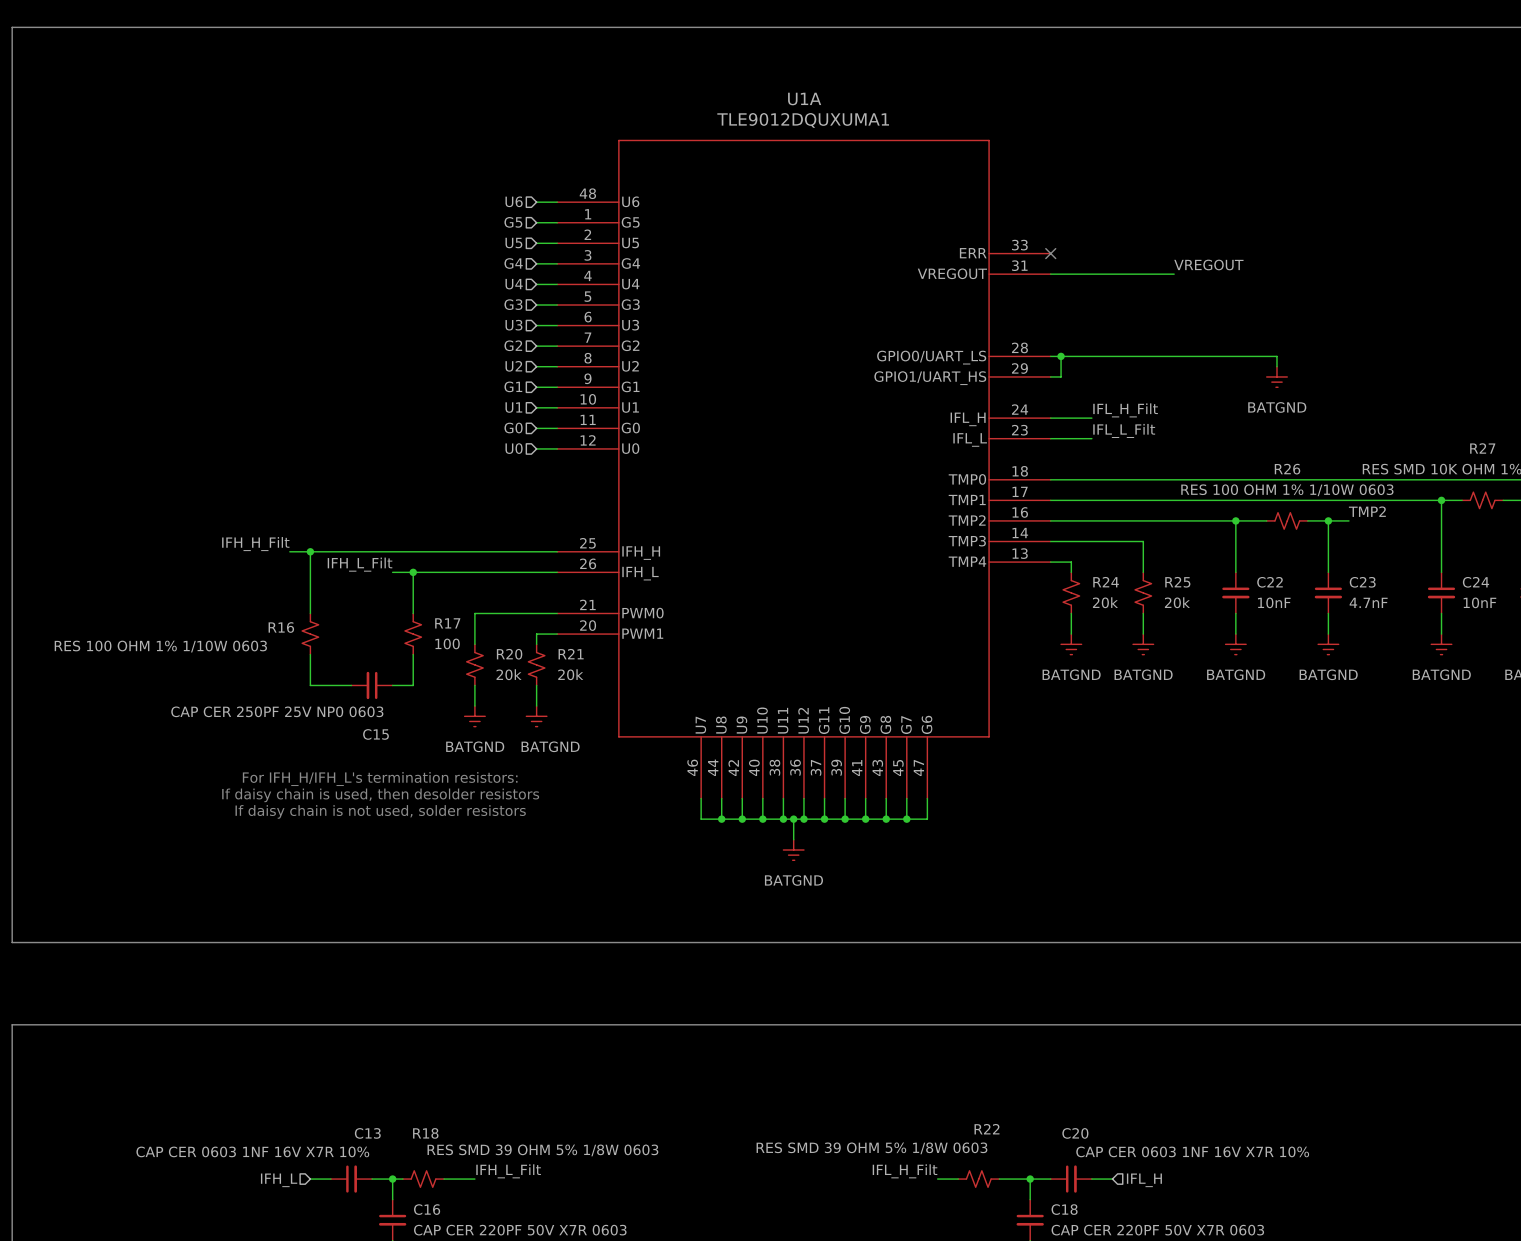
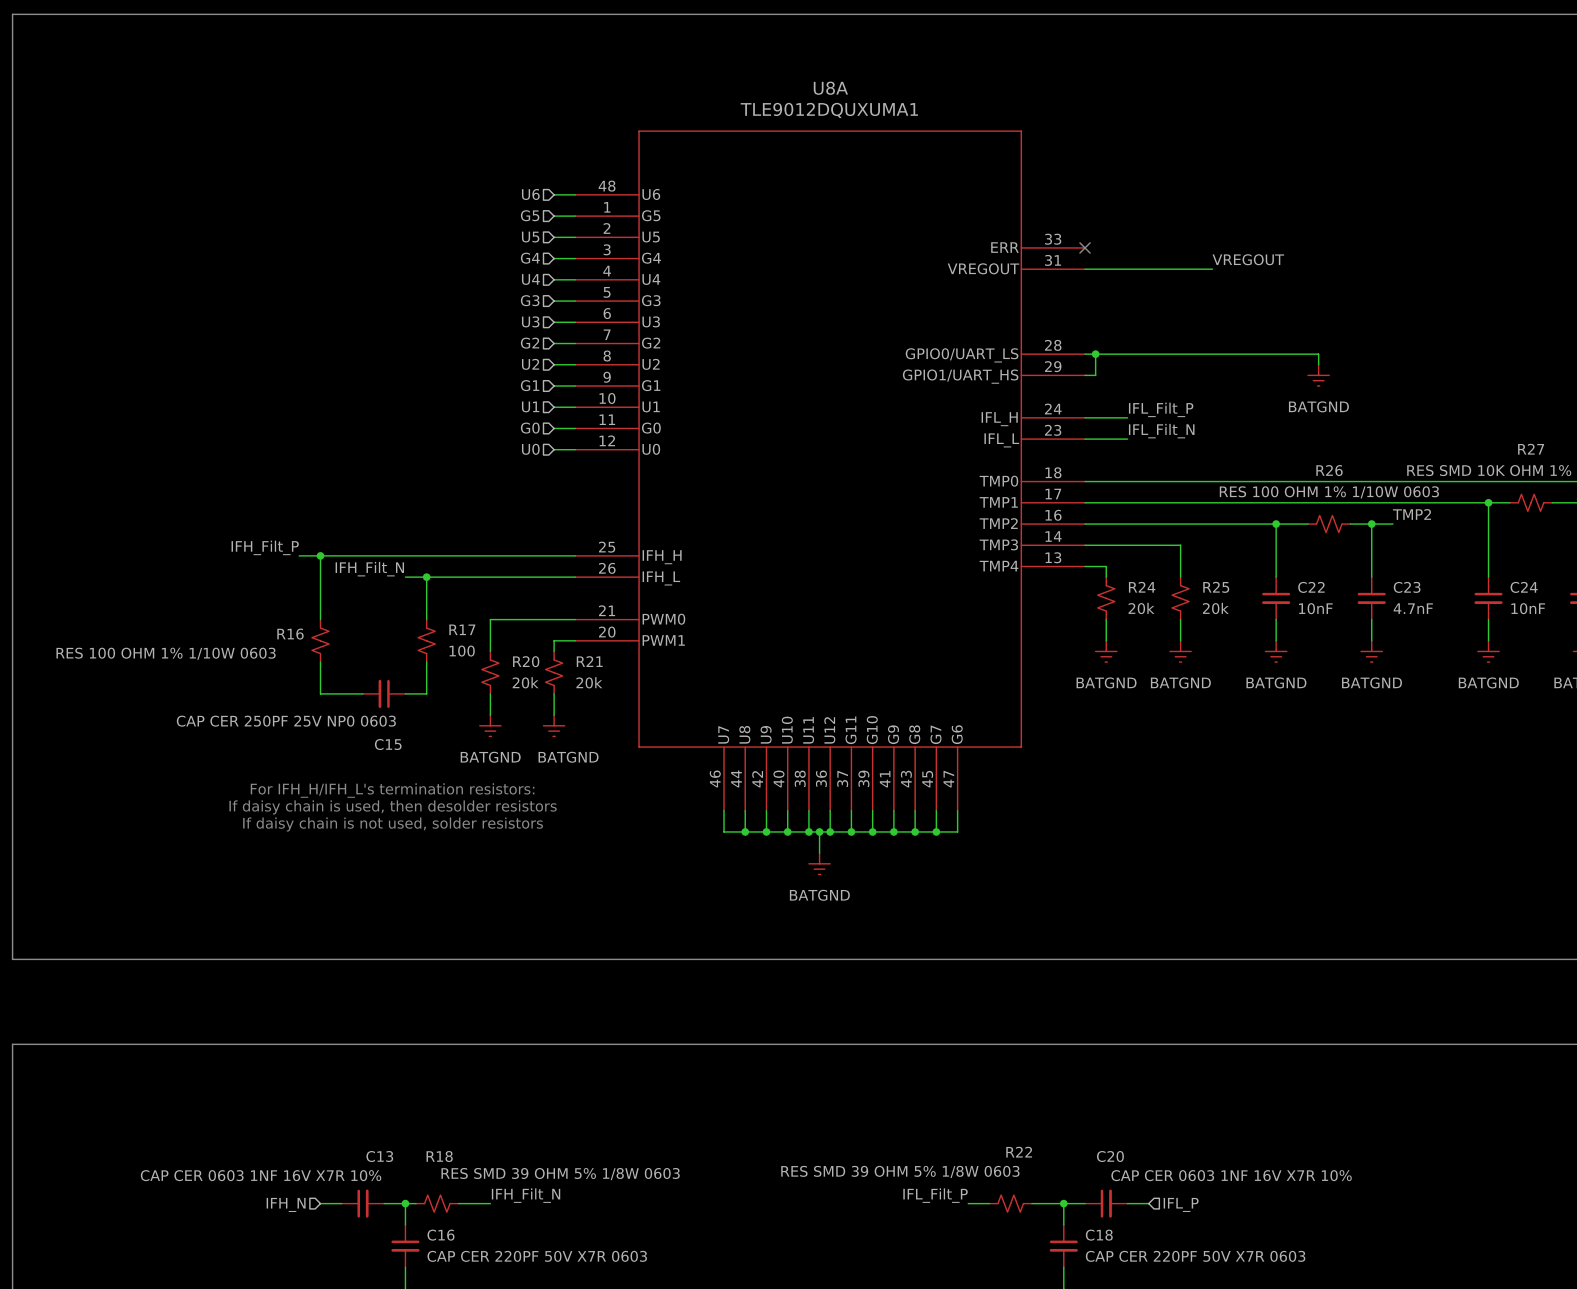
U1A name: U1A (804, 99) -> U8A (830, 88)
label: IFL_H_Filt (1125, 410) -> IFL_Filt_P (1161, 409)
label: IFL_L_Filt (1124, 430) -> IFL_Filt_N (1161, 431)
label: IFH_H_Filt (255, 544) -> IFH_Filt_P (265, 547)
label: IFH_L_Filt (360, 564) -> IFH_Filt_N (369, 569)
label: IFH_L_Filt (508, 1171) -> IFH_Filt_N (526, 1195)
label: IFL_H_Filt (905, 1171) -> IFL_Filt_P (935, 1195)
hierarchical label: IFH_L (279, 1180) -> IFH_N (286, 1204)
hierarchical label: IFL_H (1144, 1180) -> IFL_P (1181, 1204)

